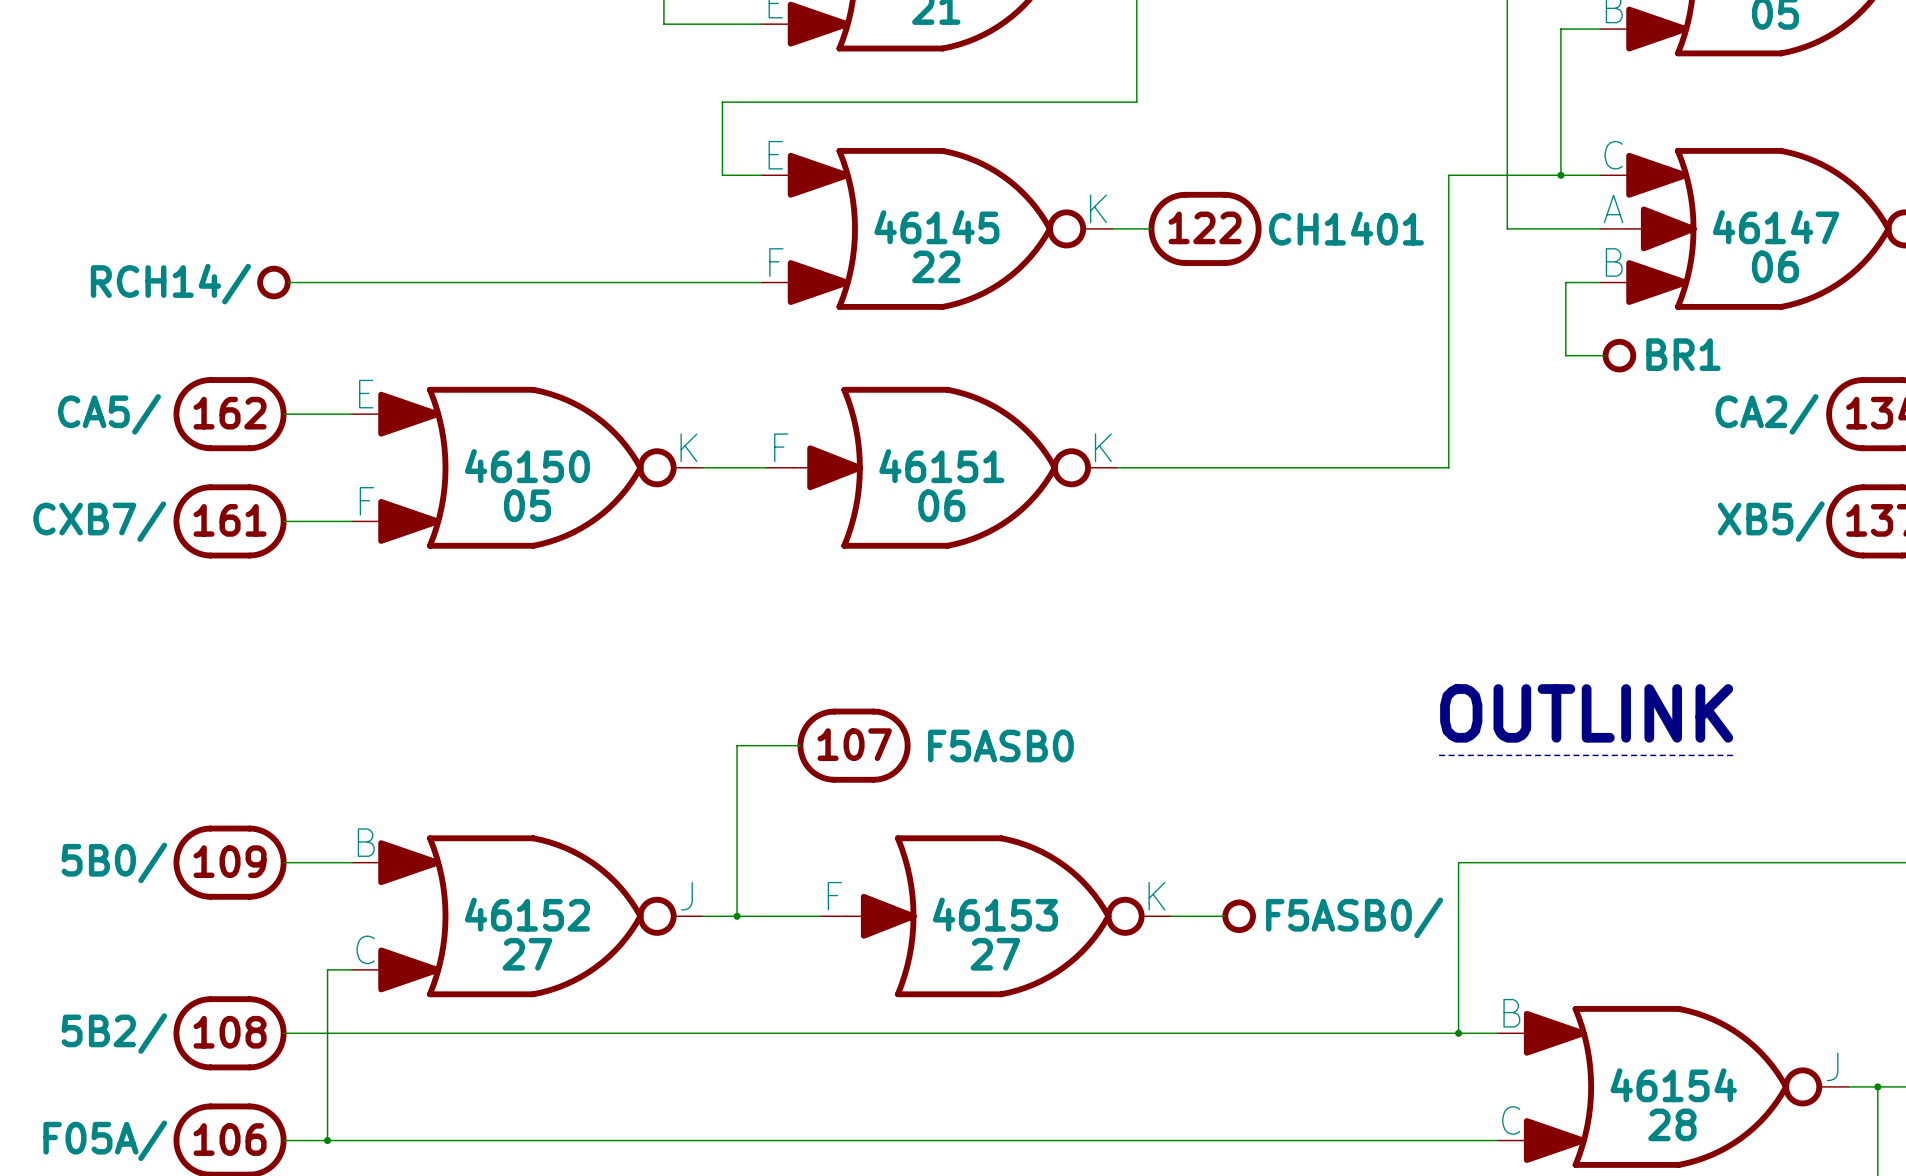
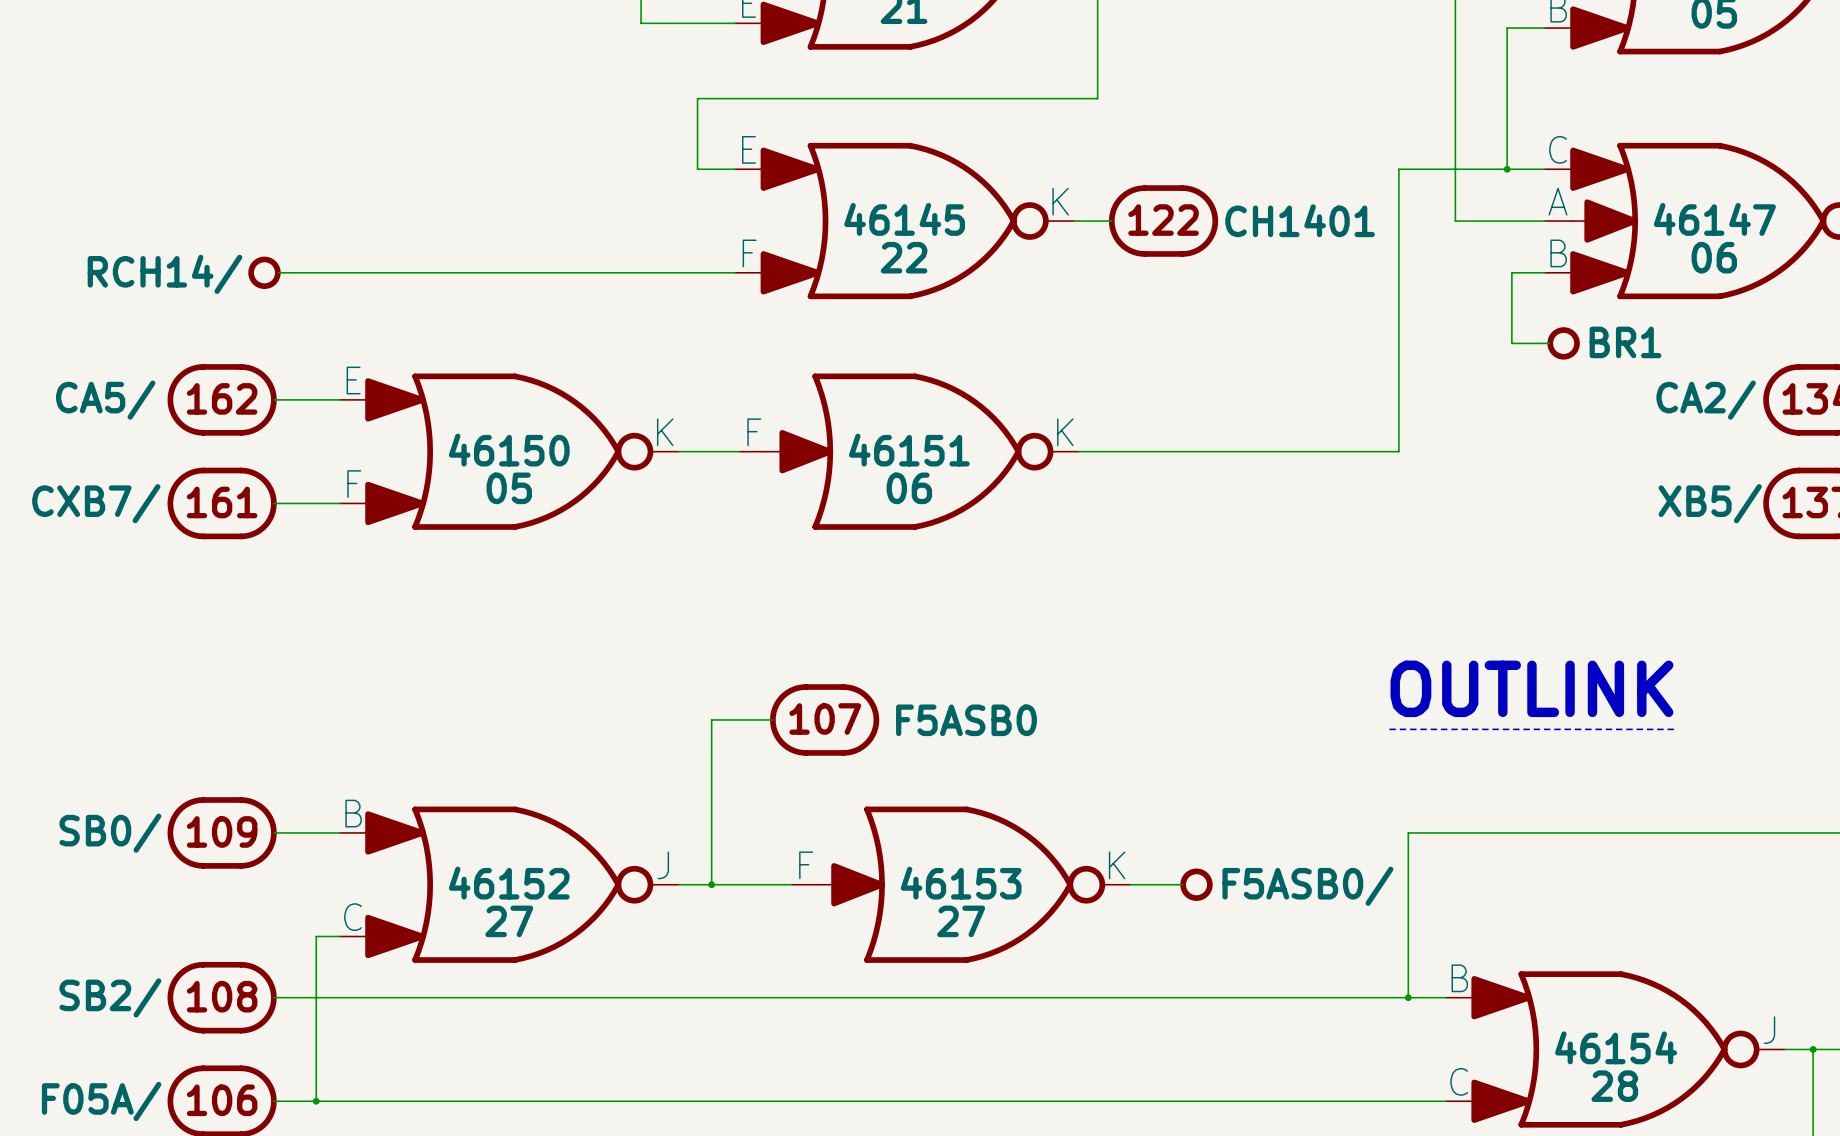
part text: 5B0/ (114, 862) -> SB0/ (110, 833)
part text: 5B2/ (114, 1033) -> SB2/ (110, 997)

